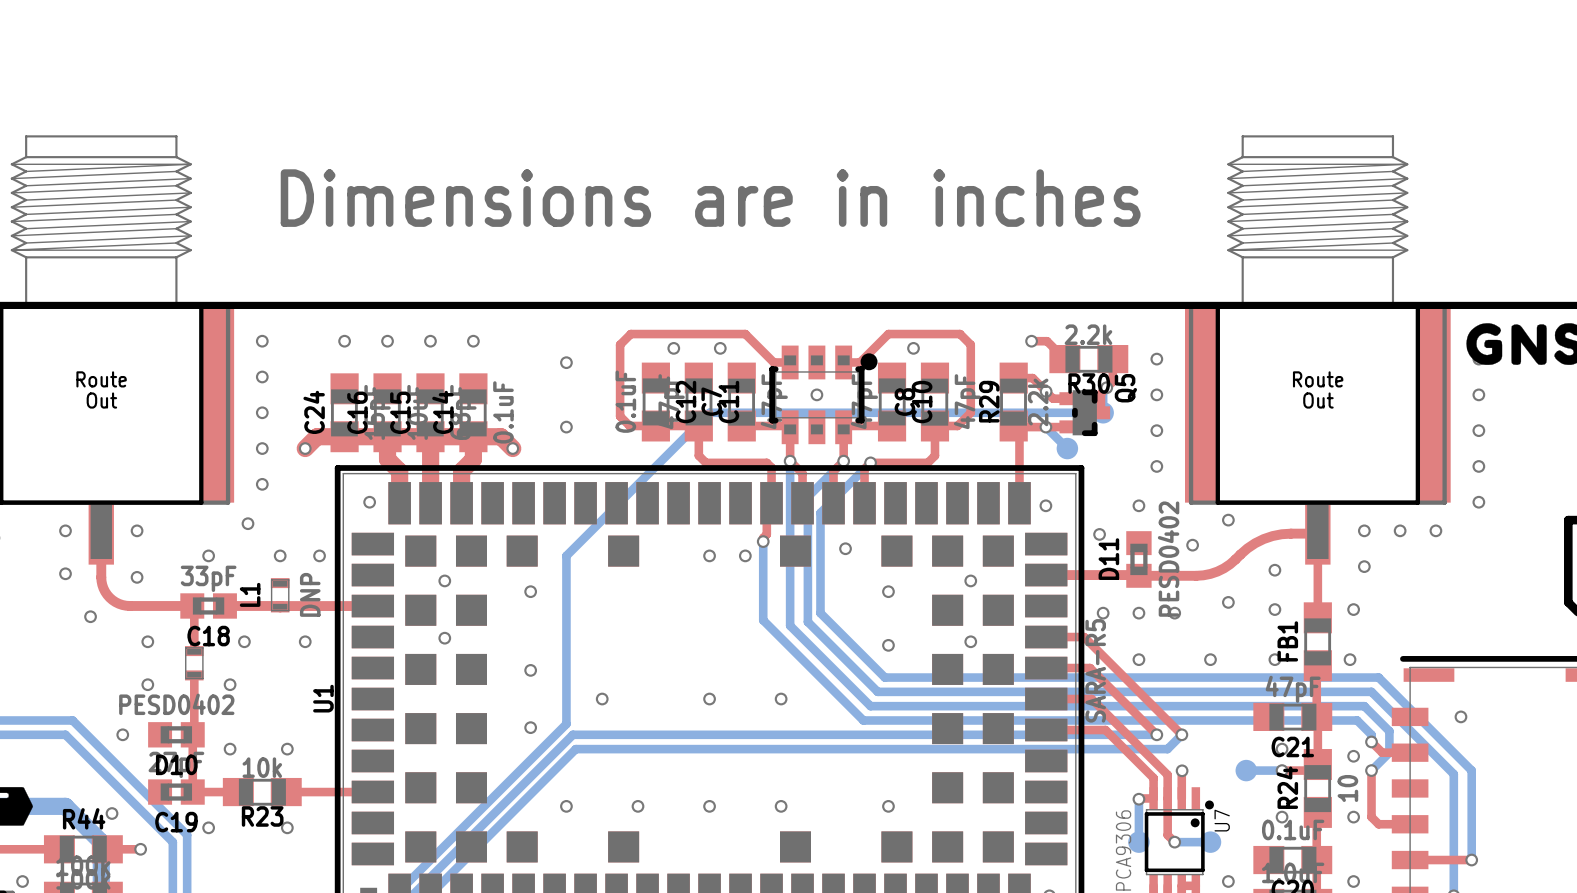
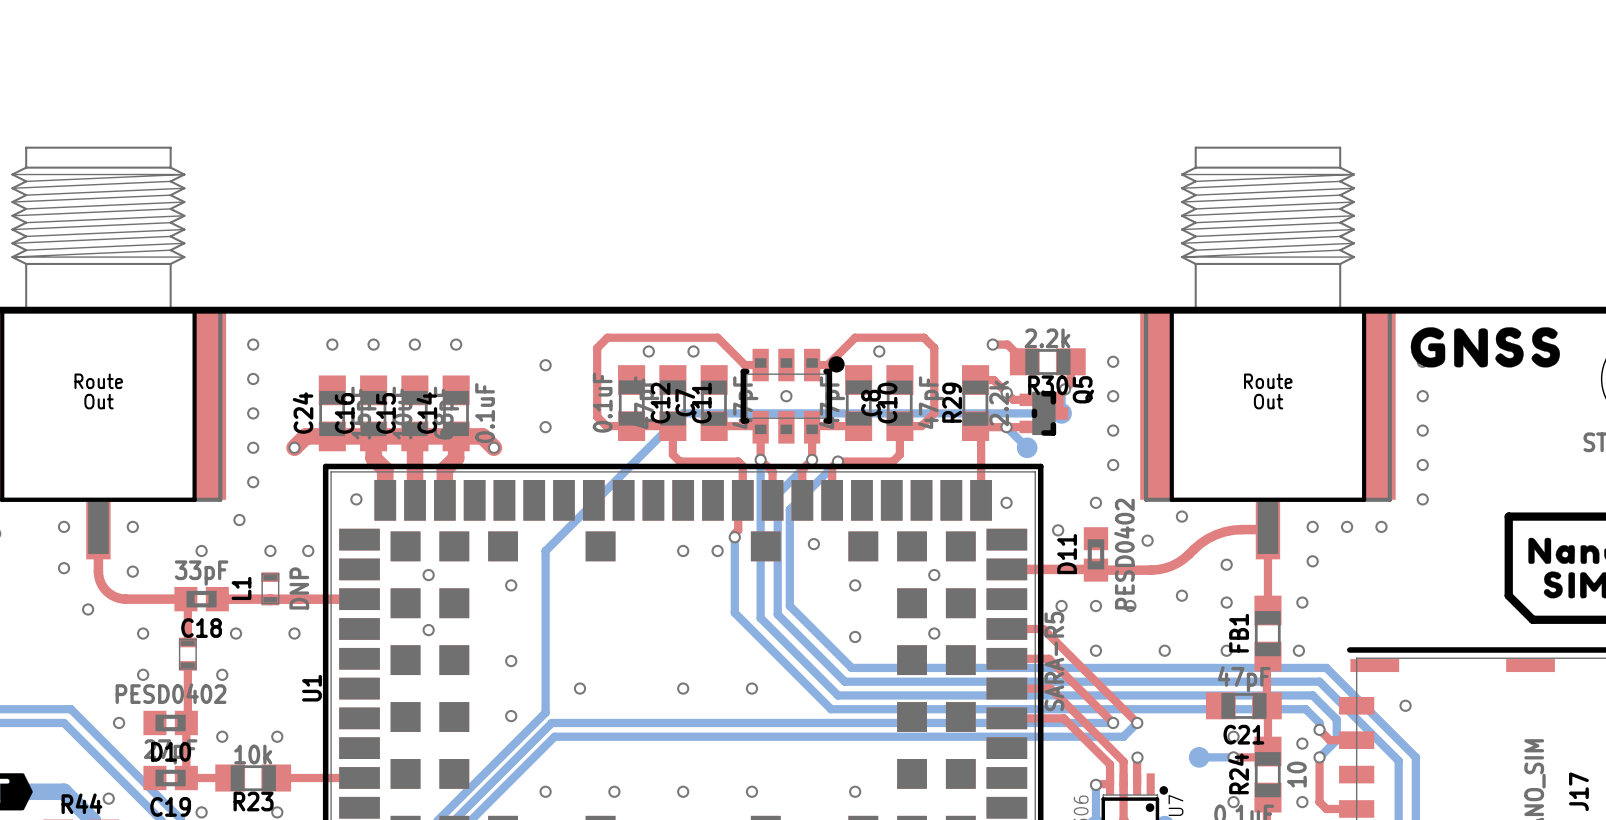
text: Dimensions are in inches (710, 198) -> none

